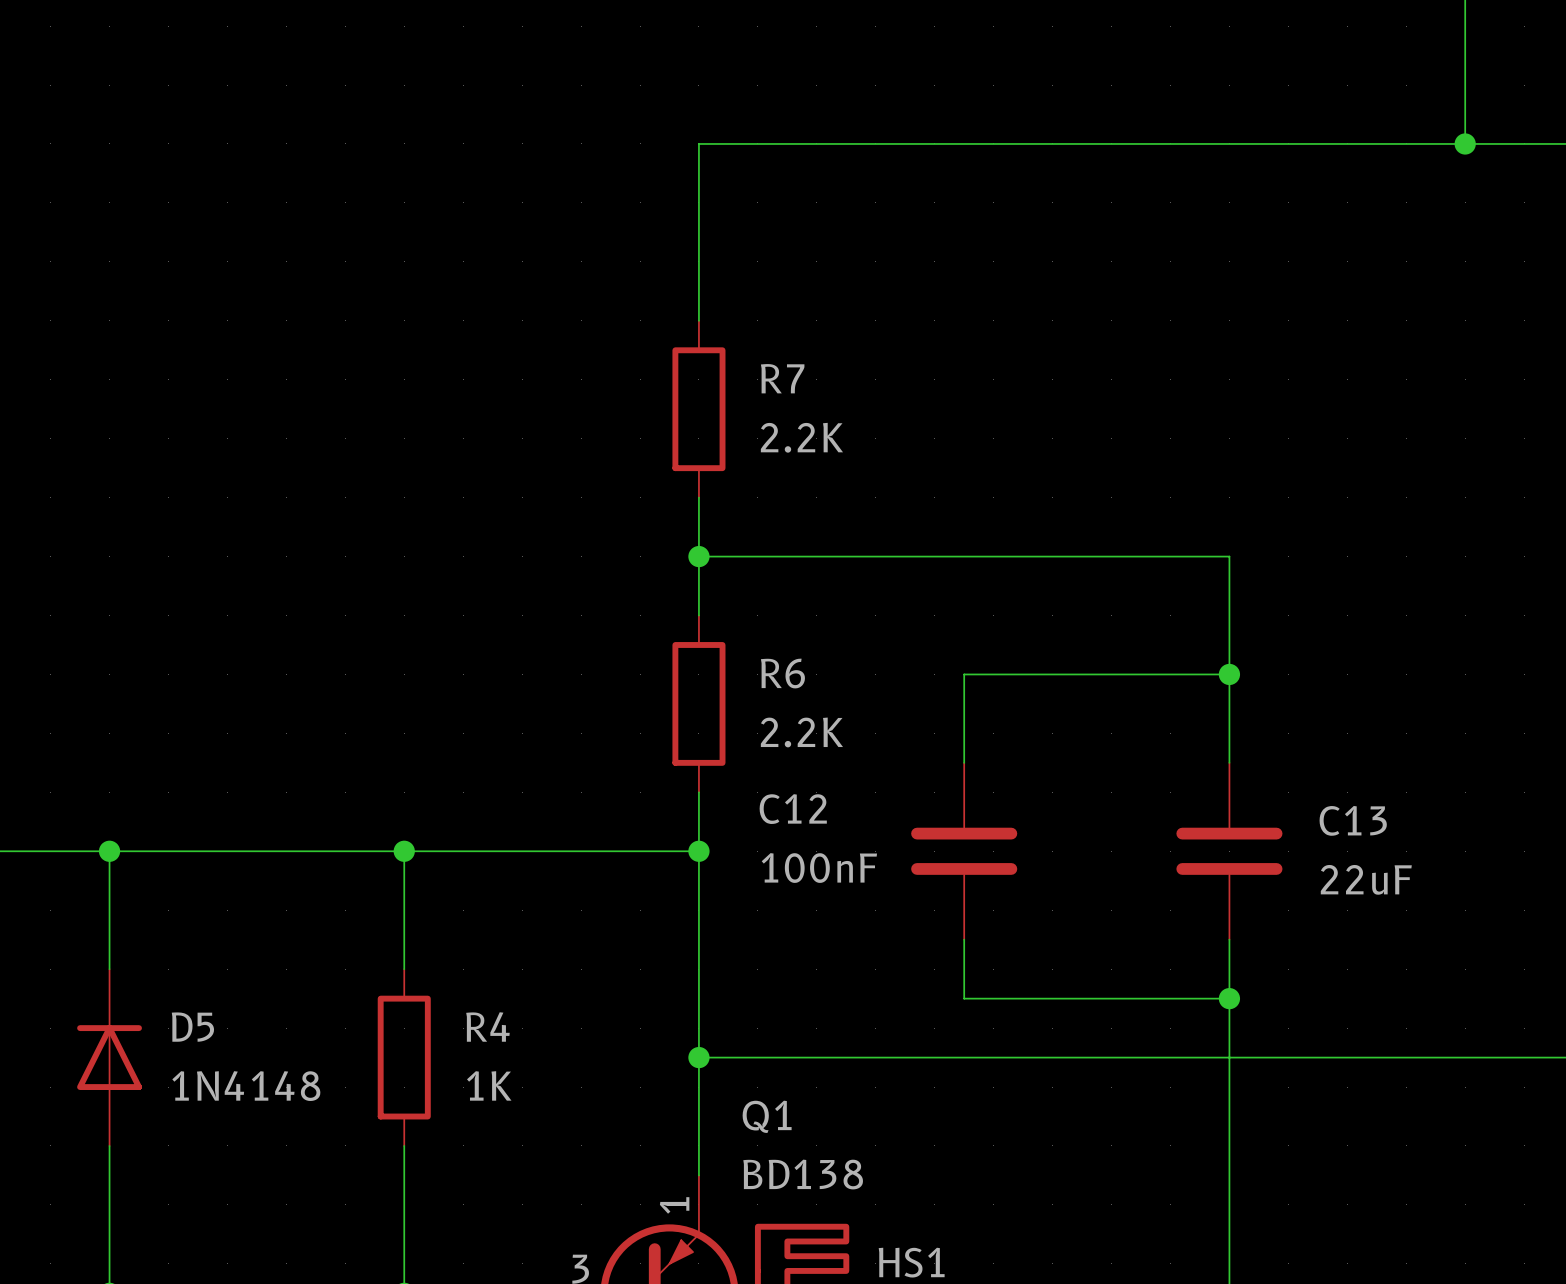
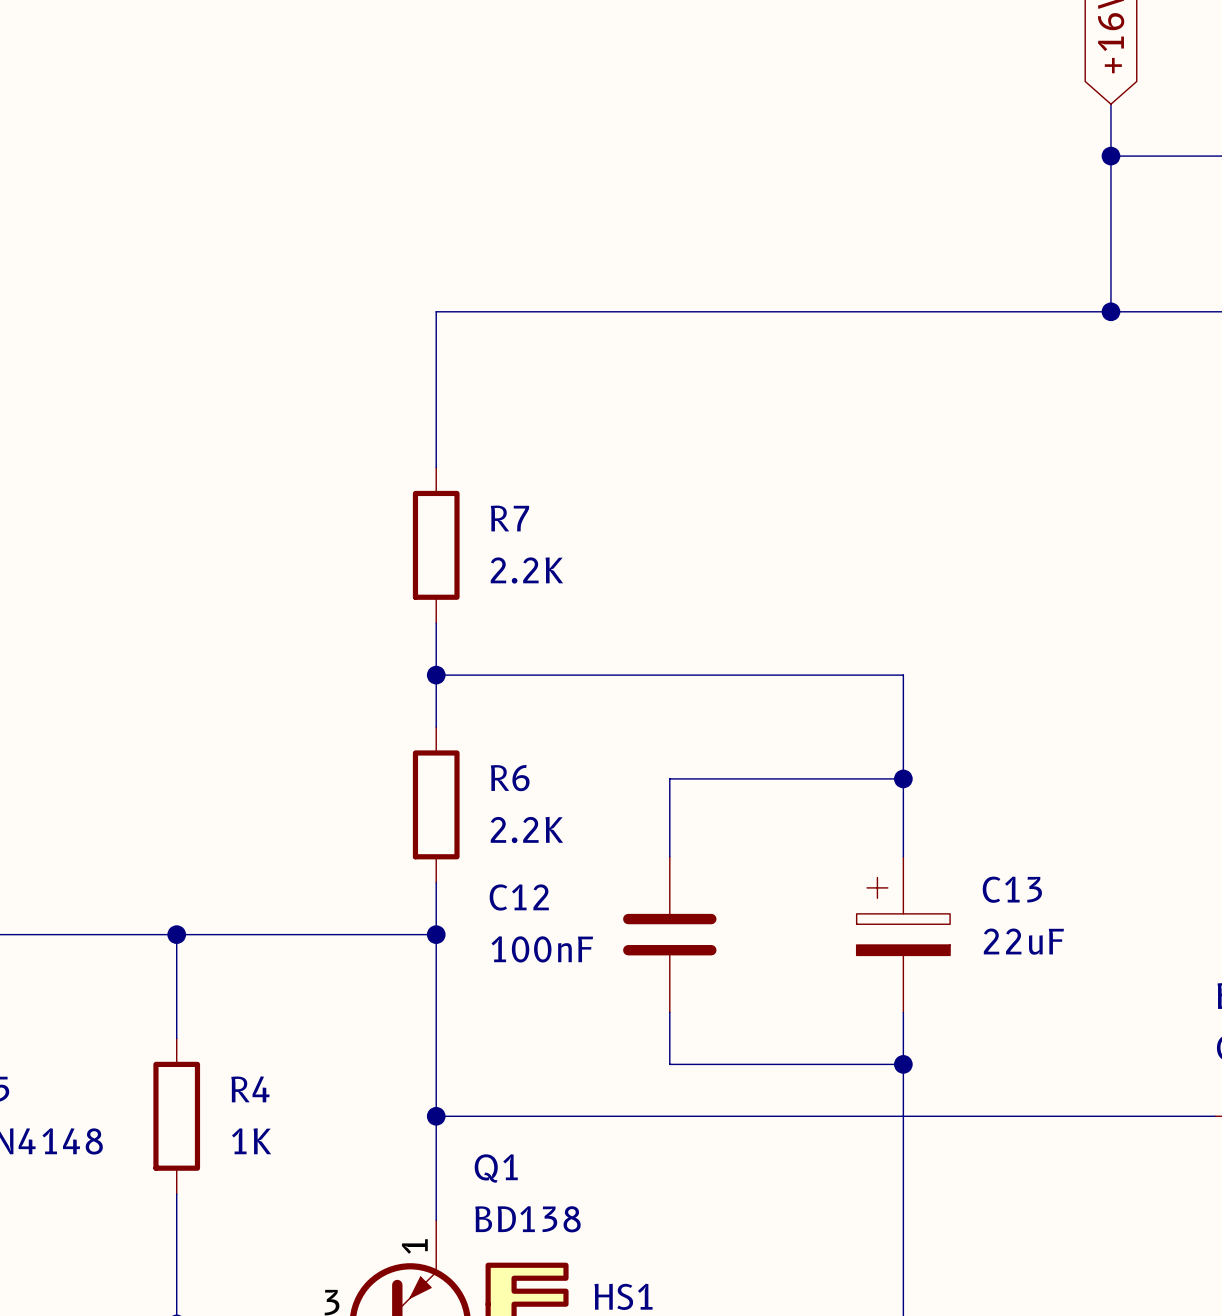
C13 symbol: [1176, 762, 1283, 940] -> [856, 856, 951, 1013]

